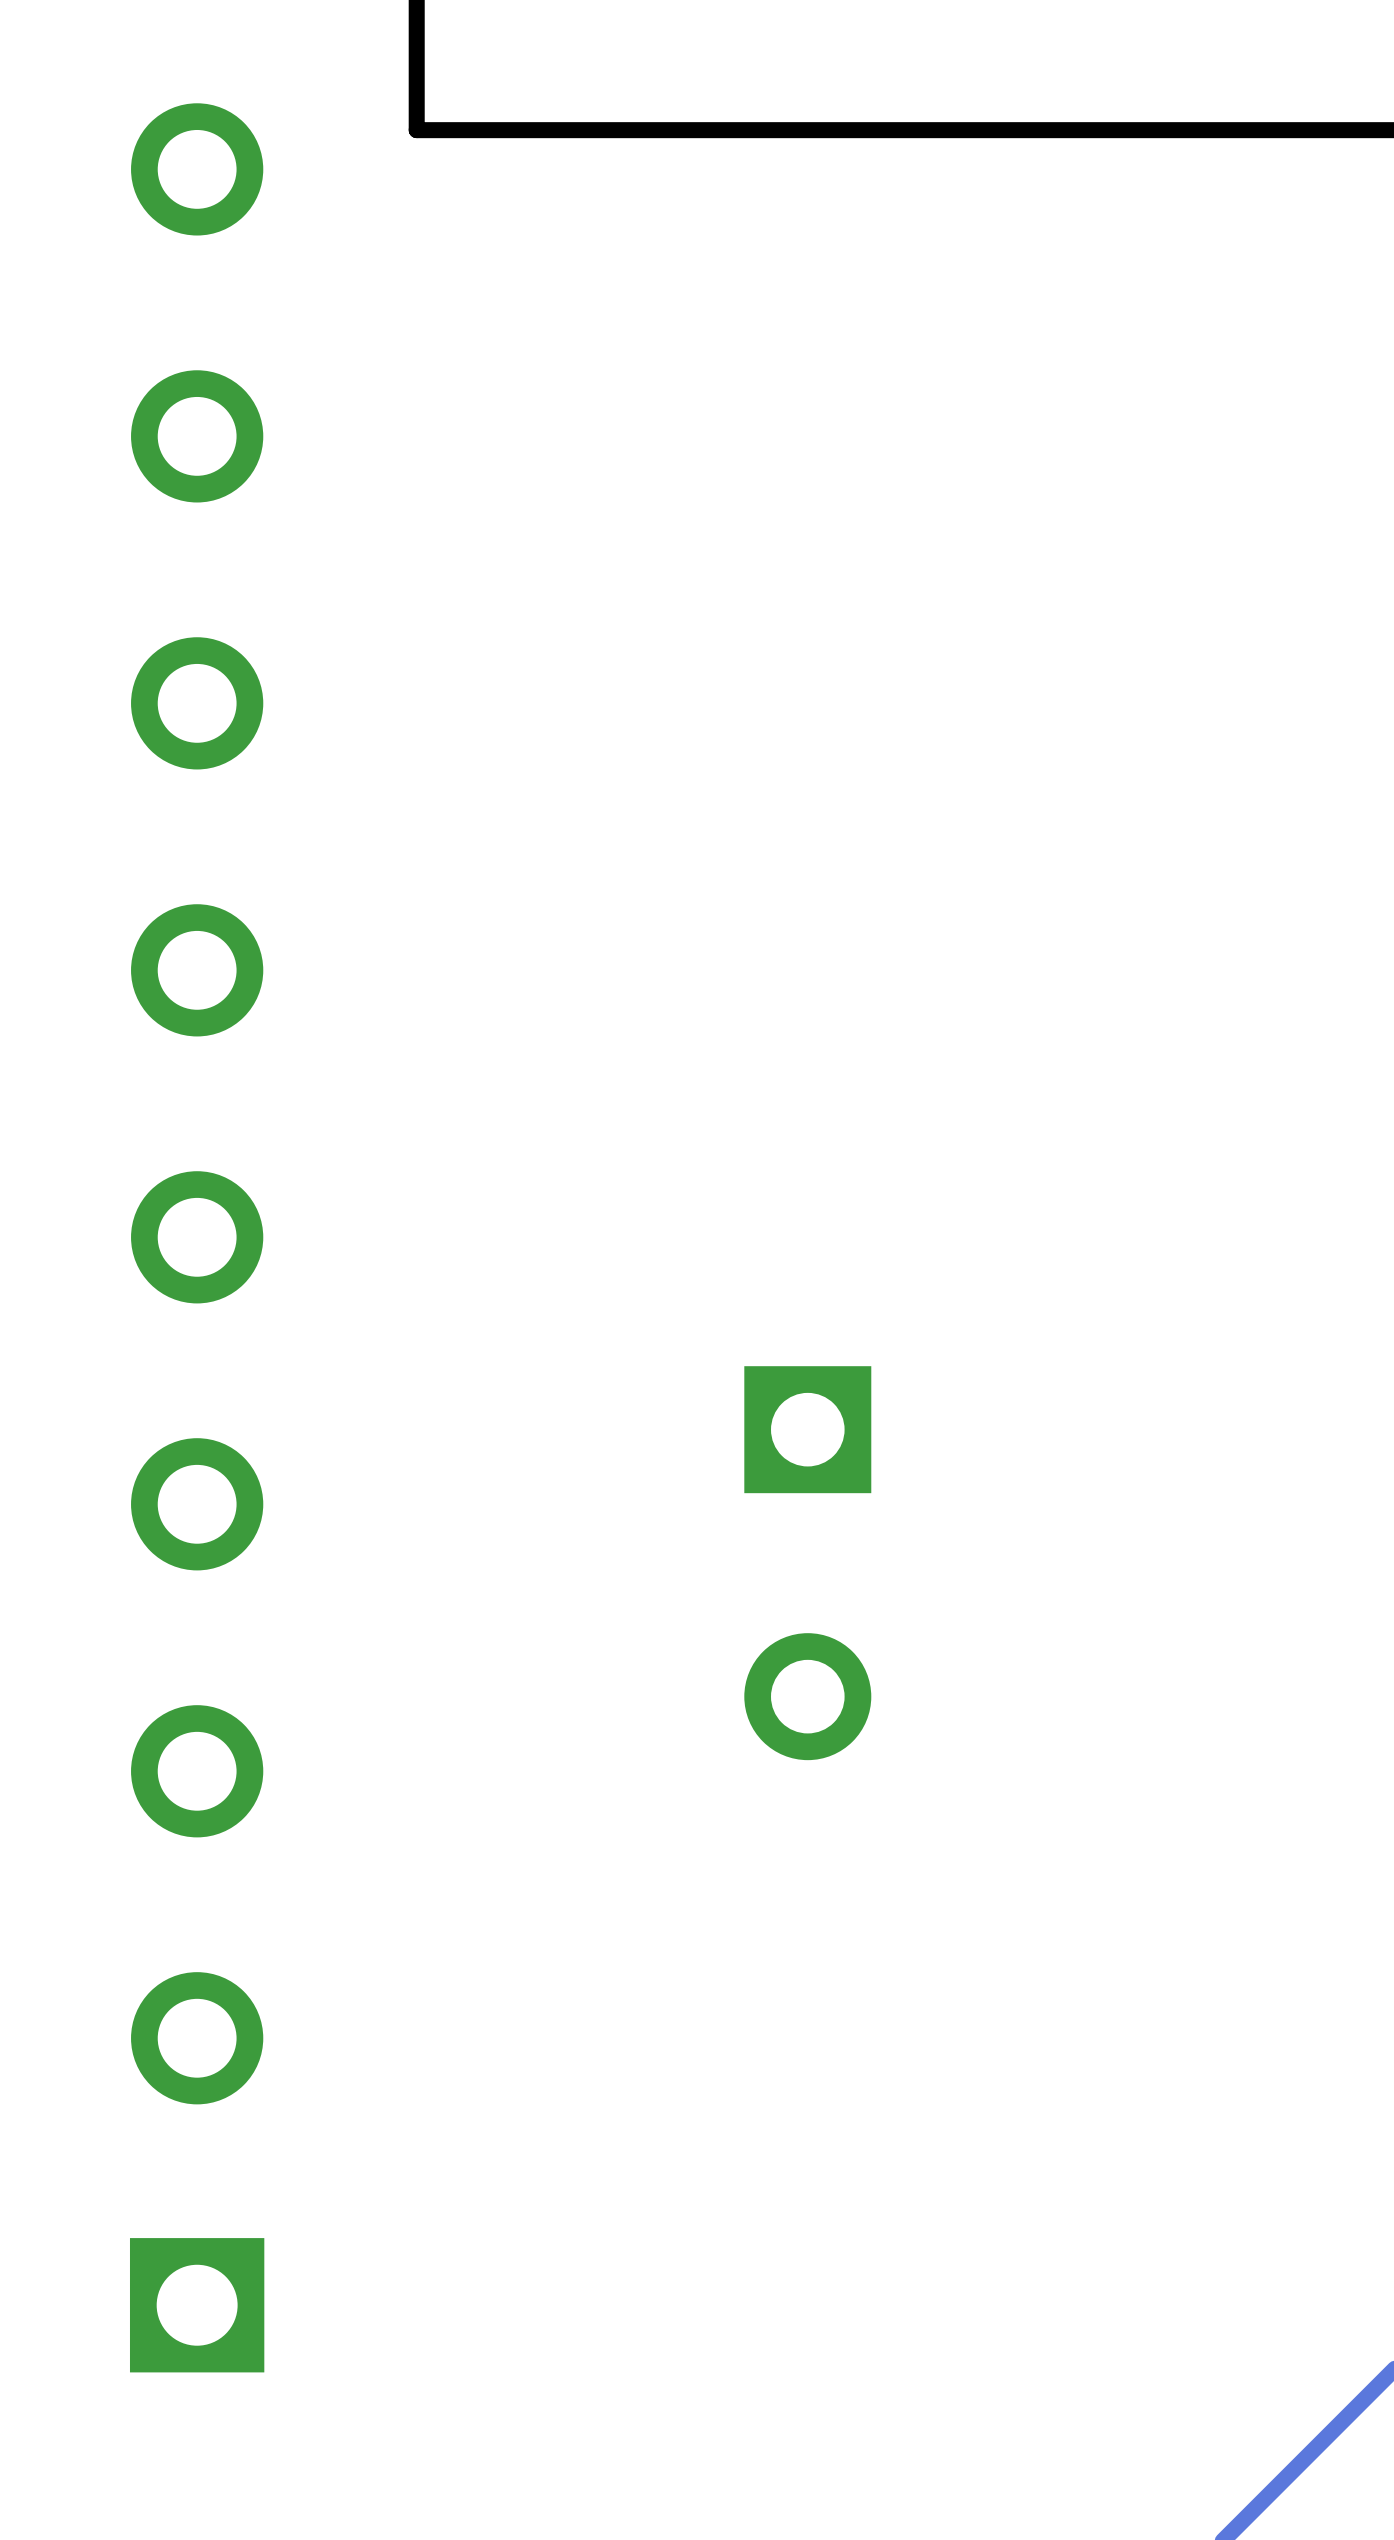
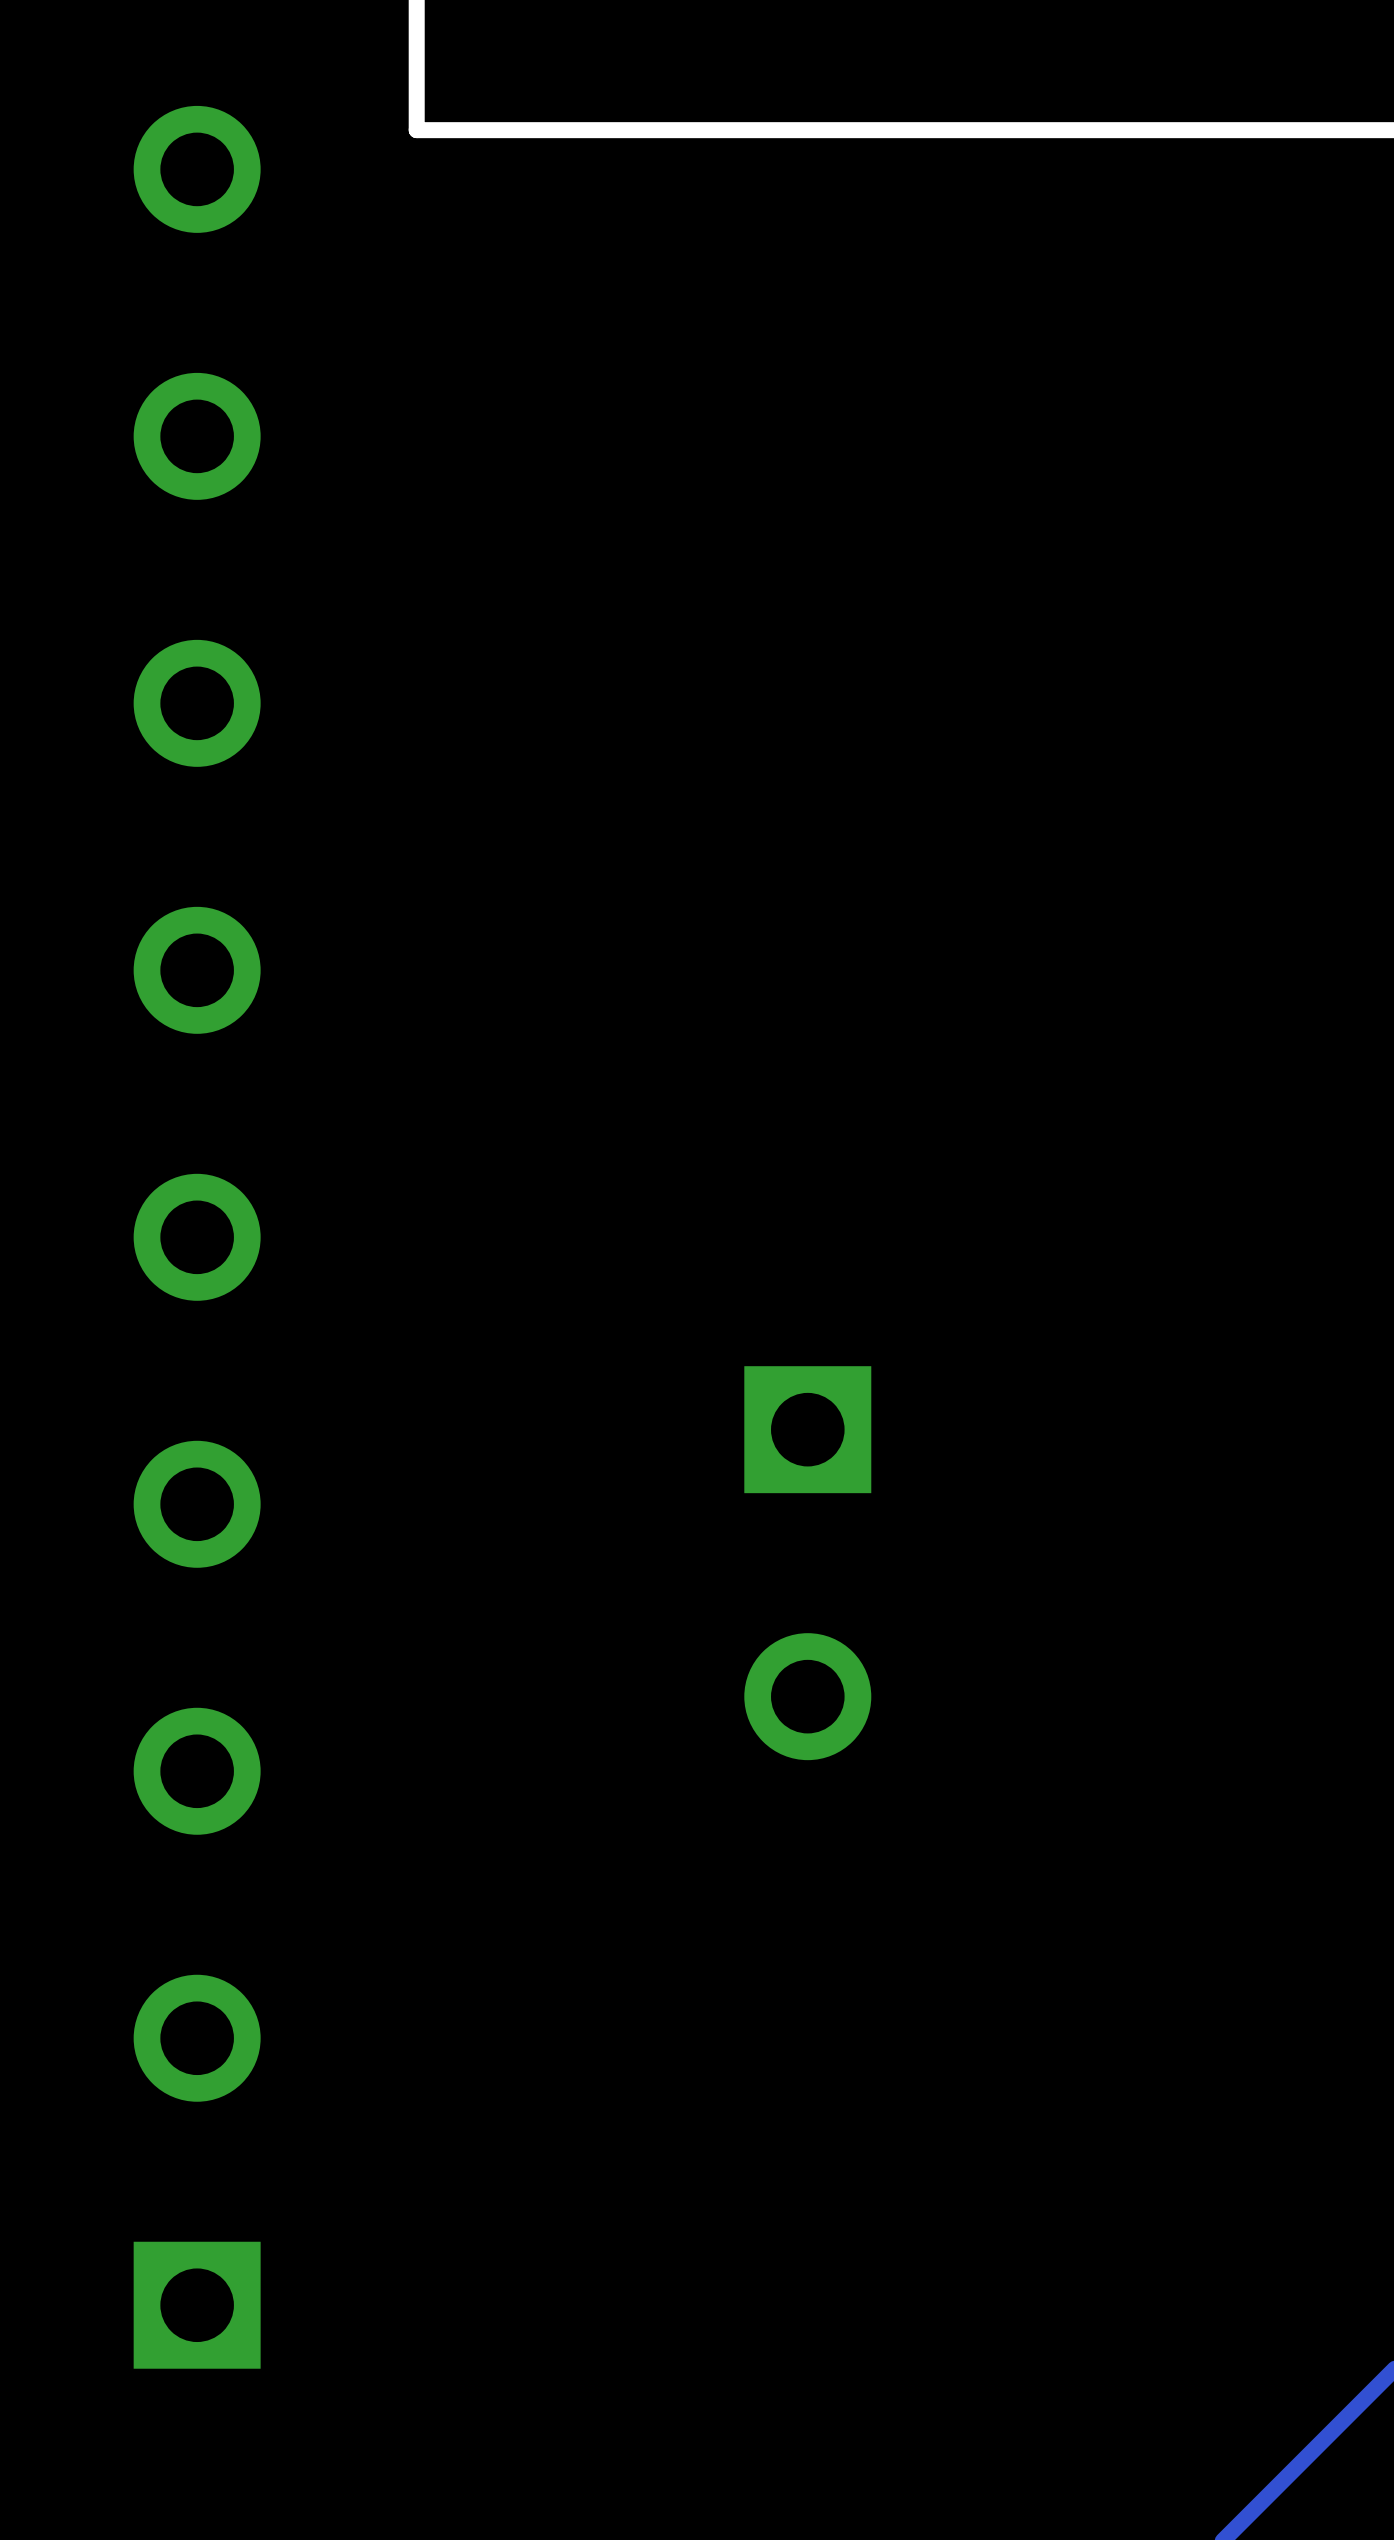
part footprint: [129, 103, 265, 2373] -> [133, 105, 261, 2369]

